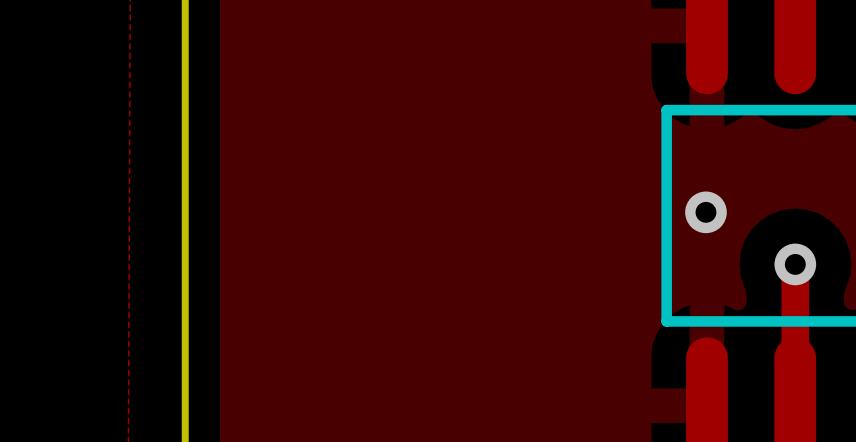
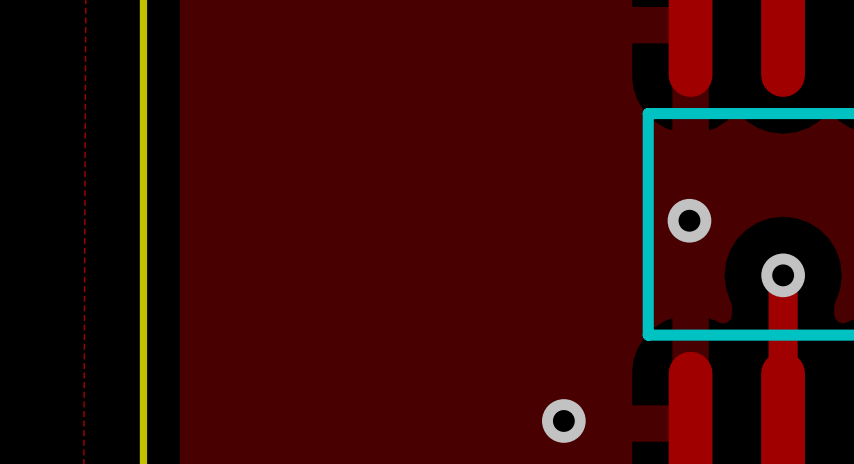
via: none -> (563, 420)

